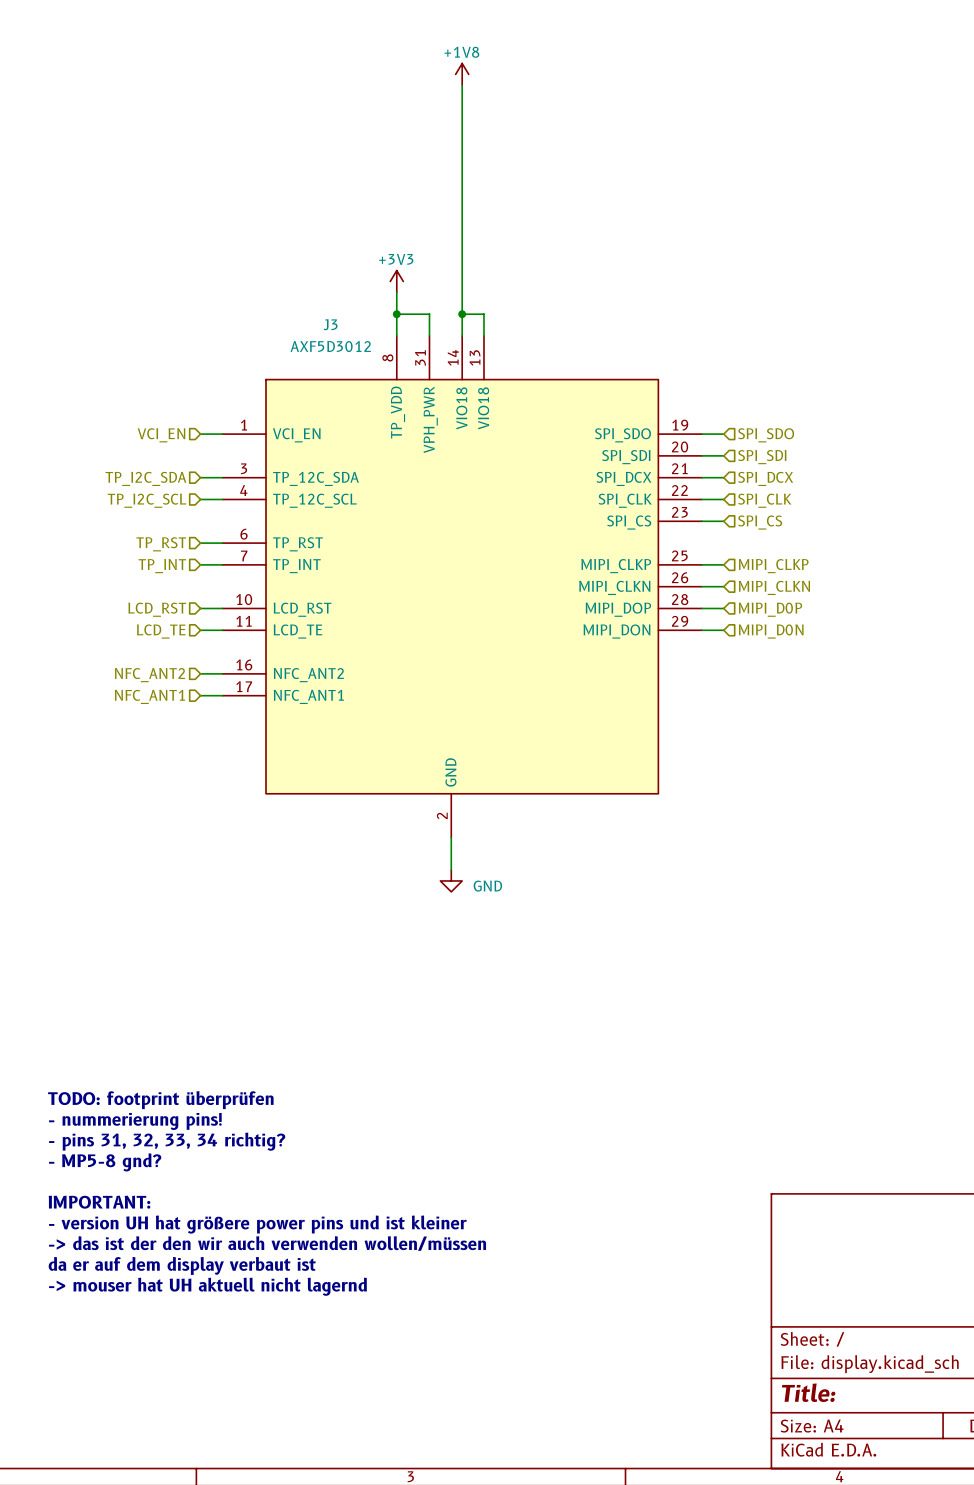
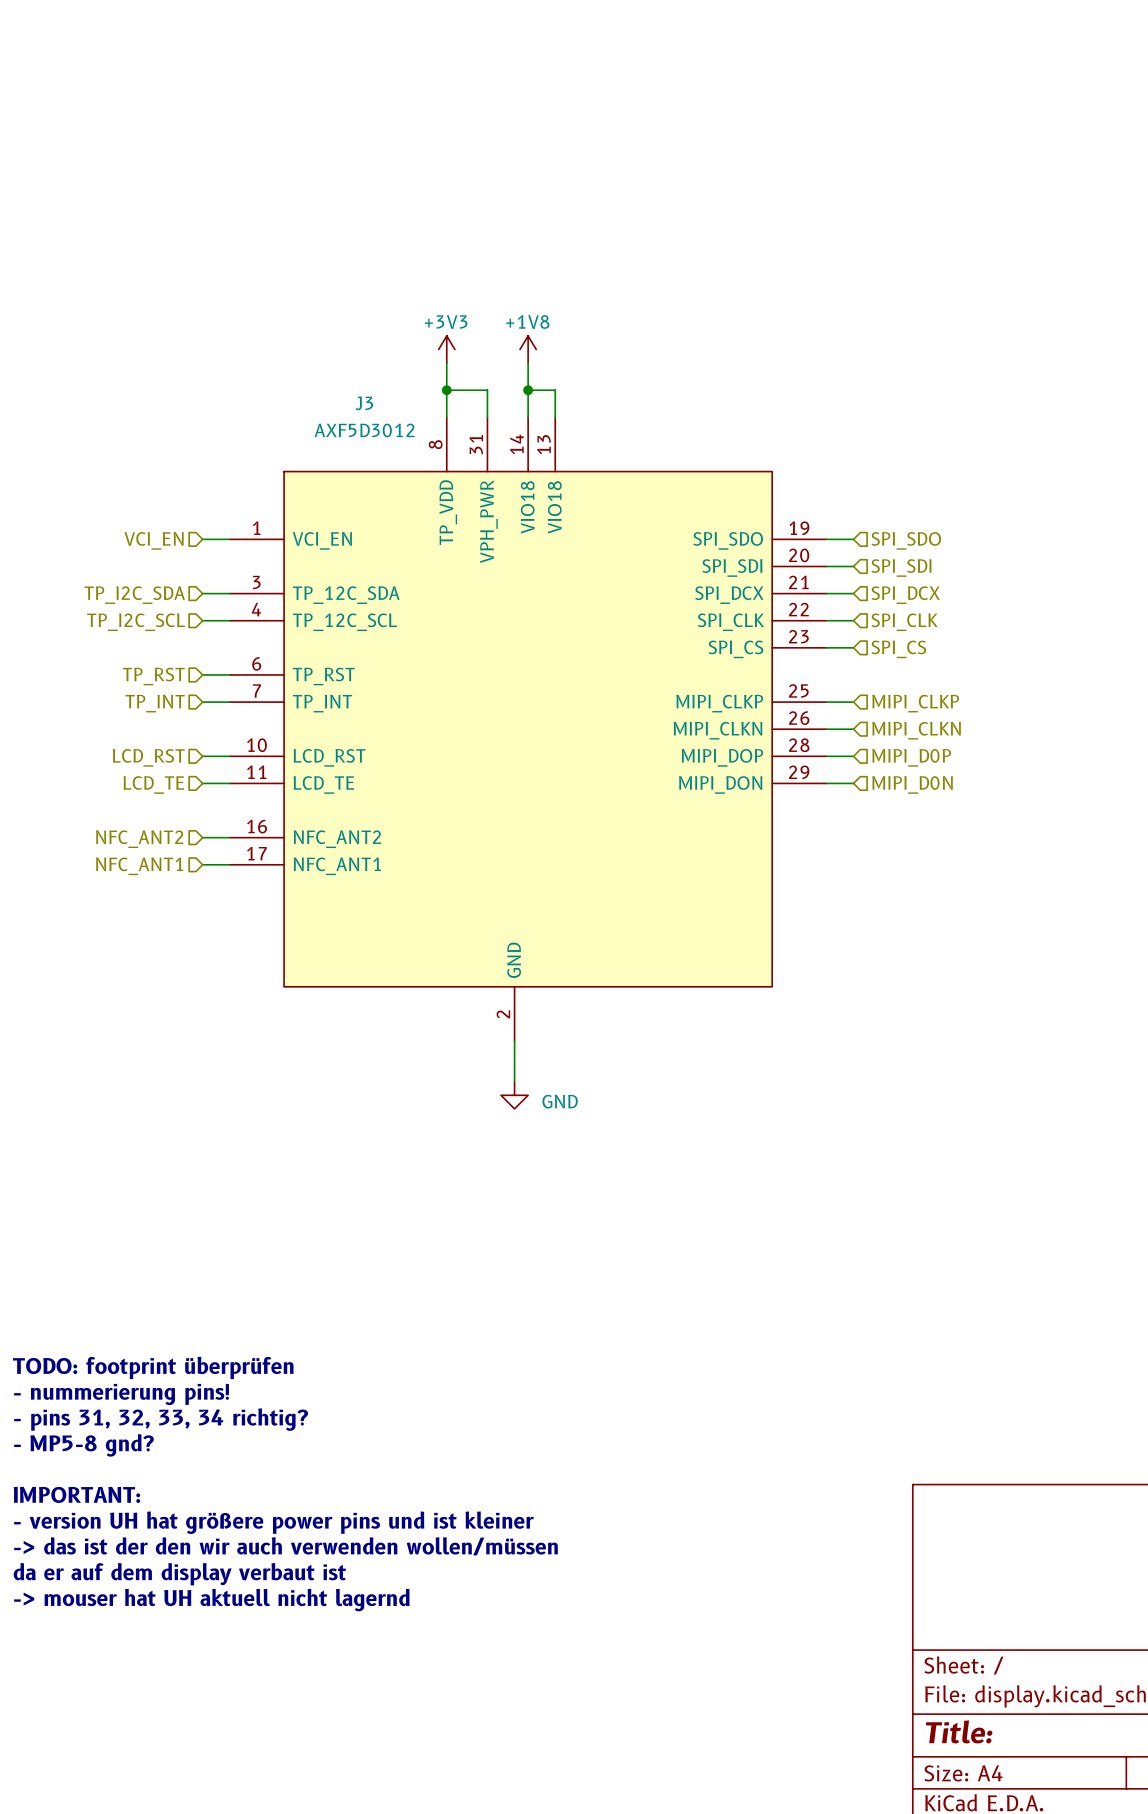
power symbol position: +1V8 (462, 74) -> +1V8 (528, 349)
wire: (462, 85) (462, 292) -> none

